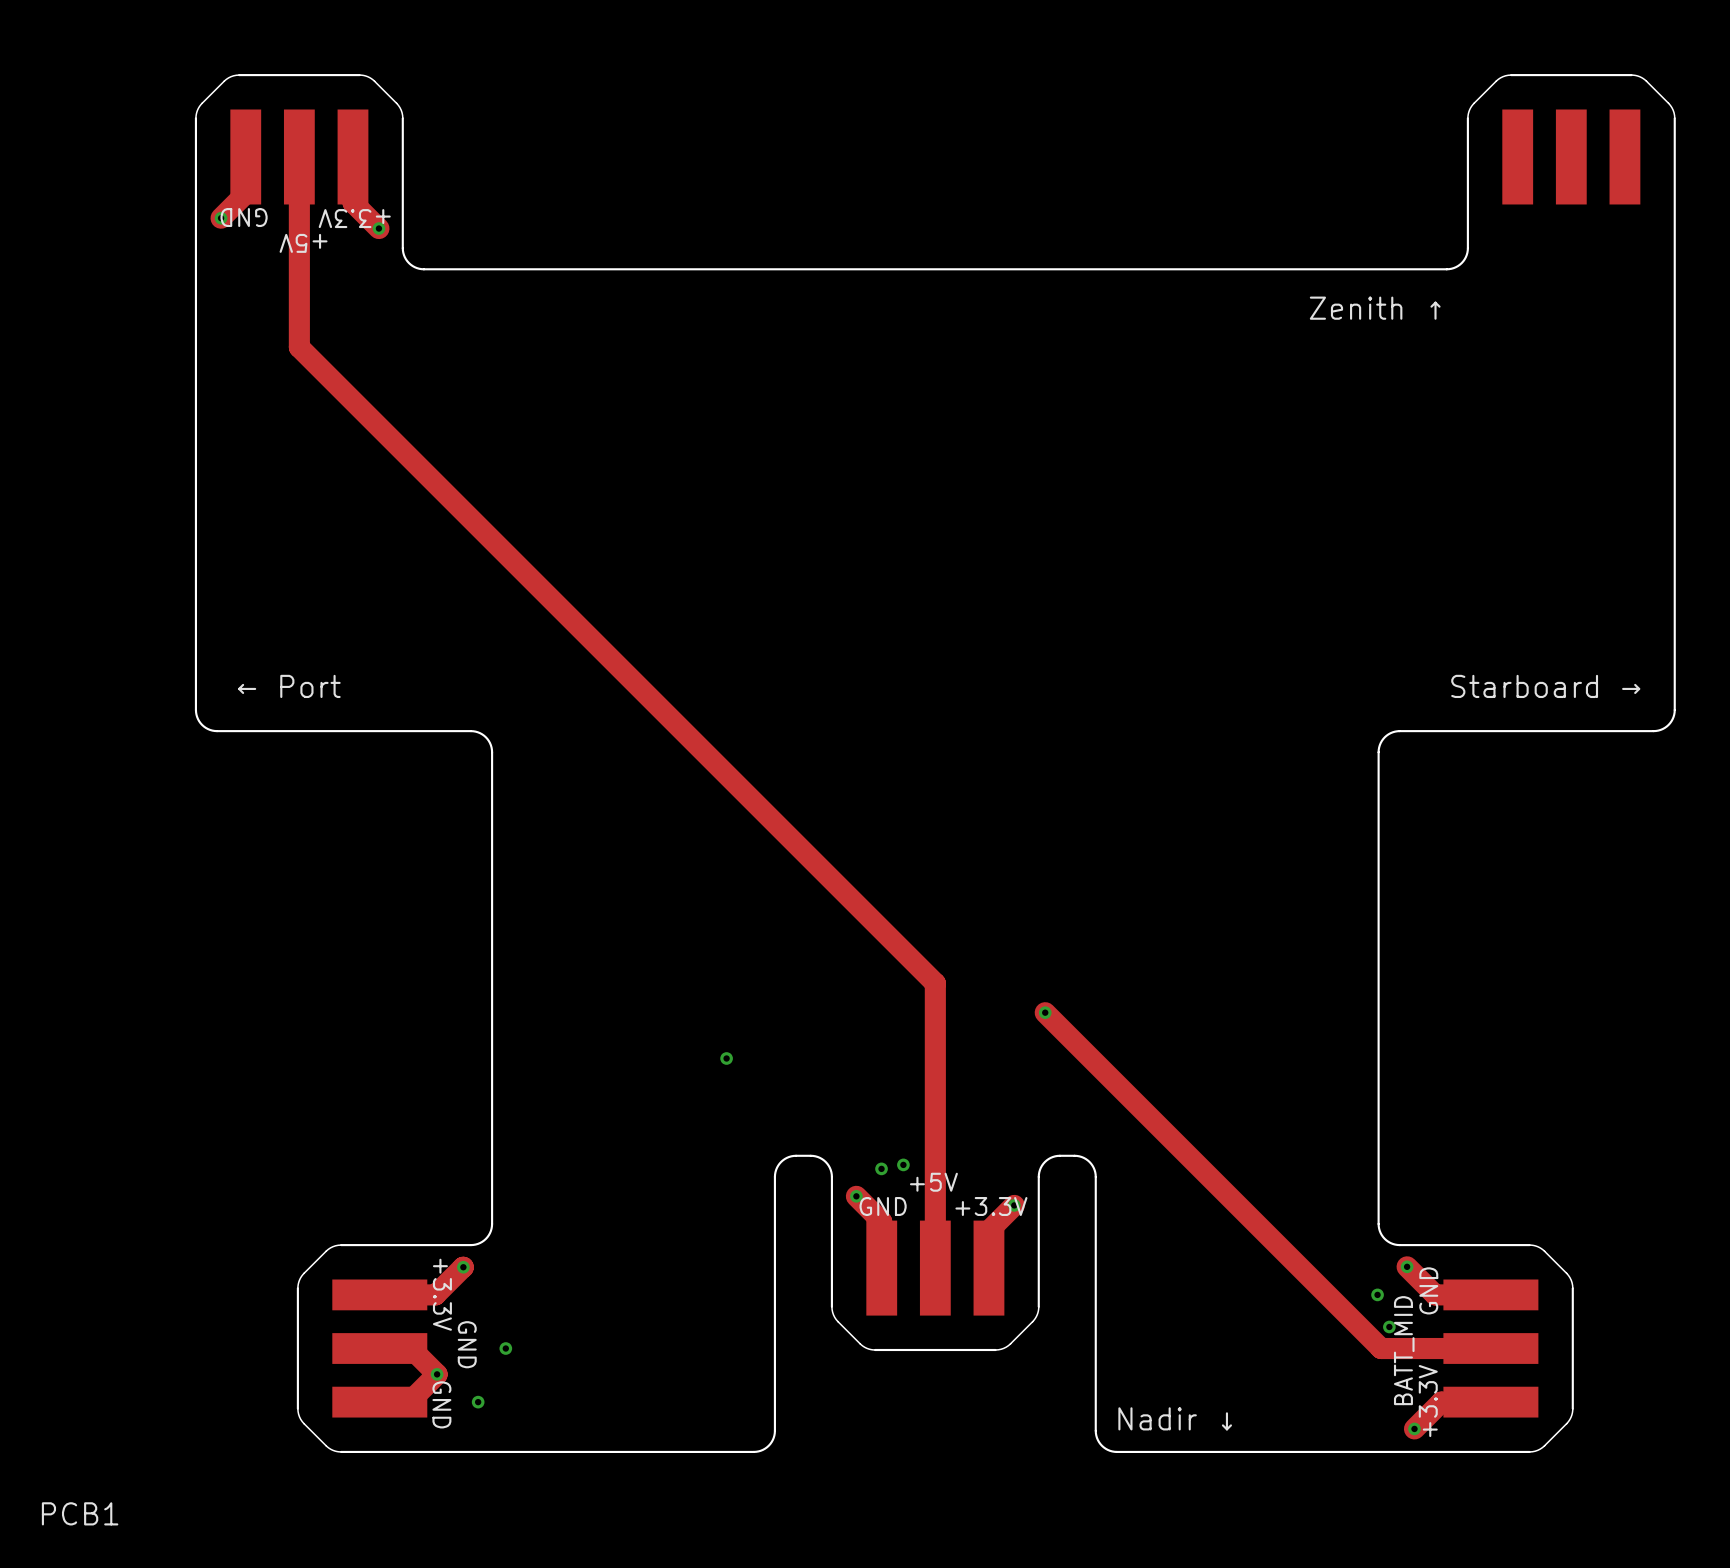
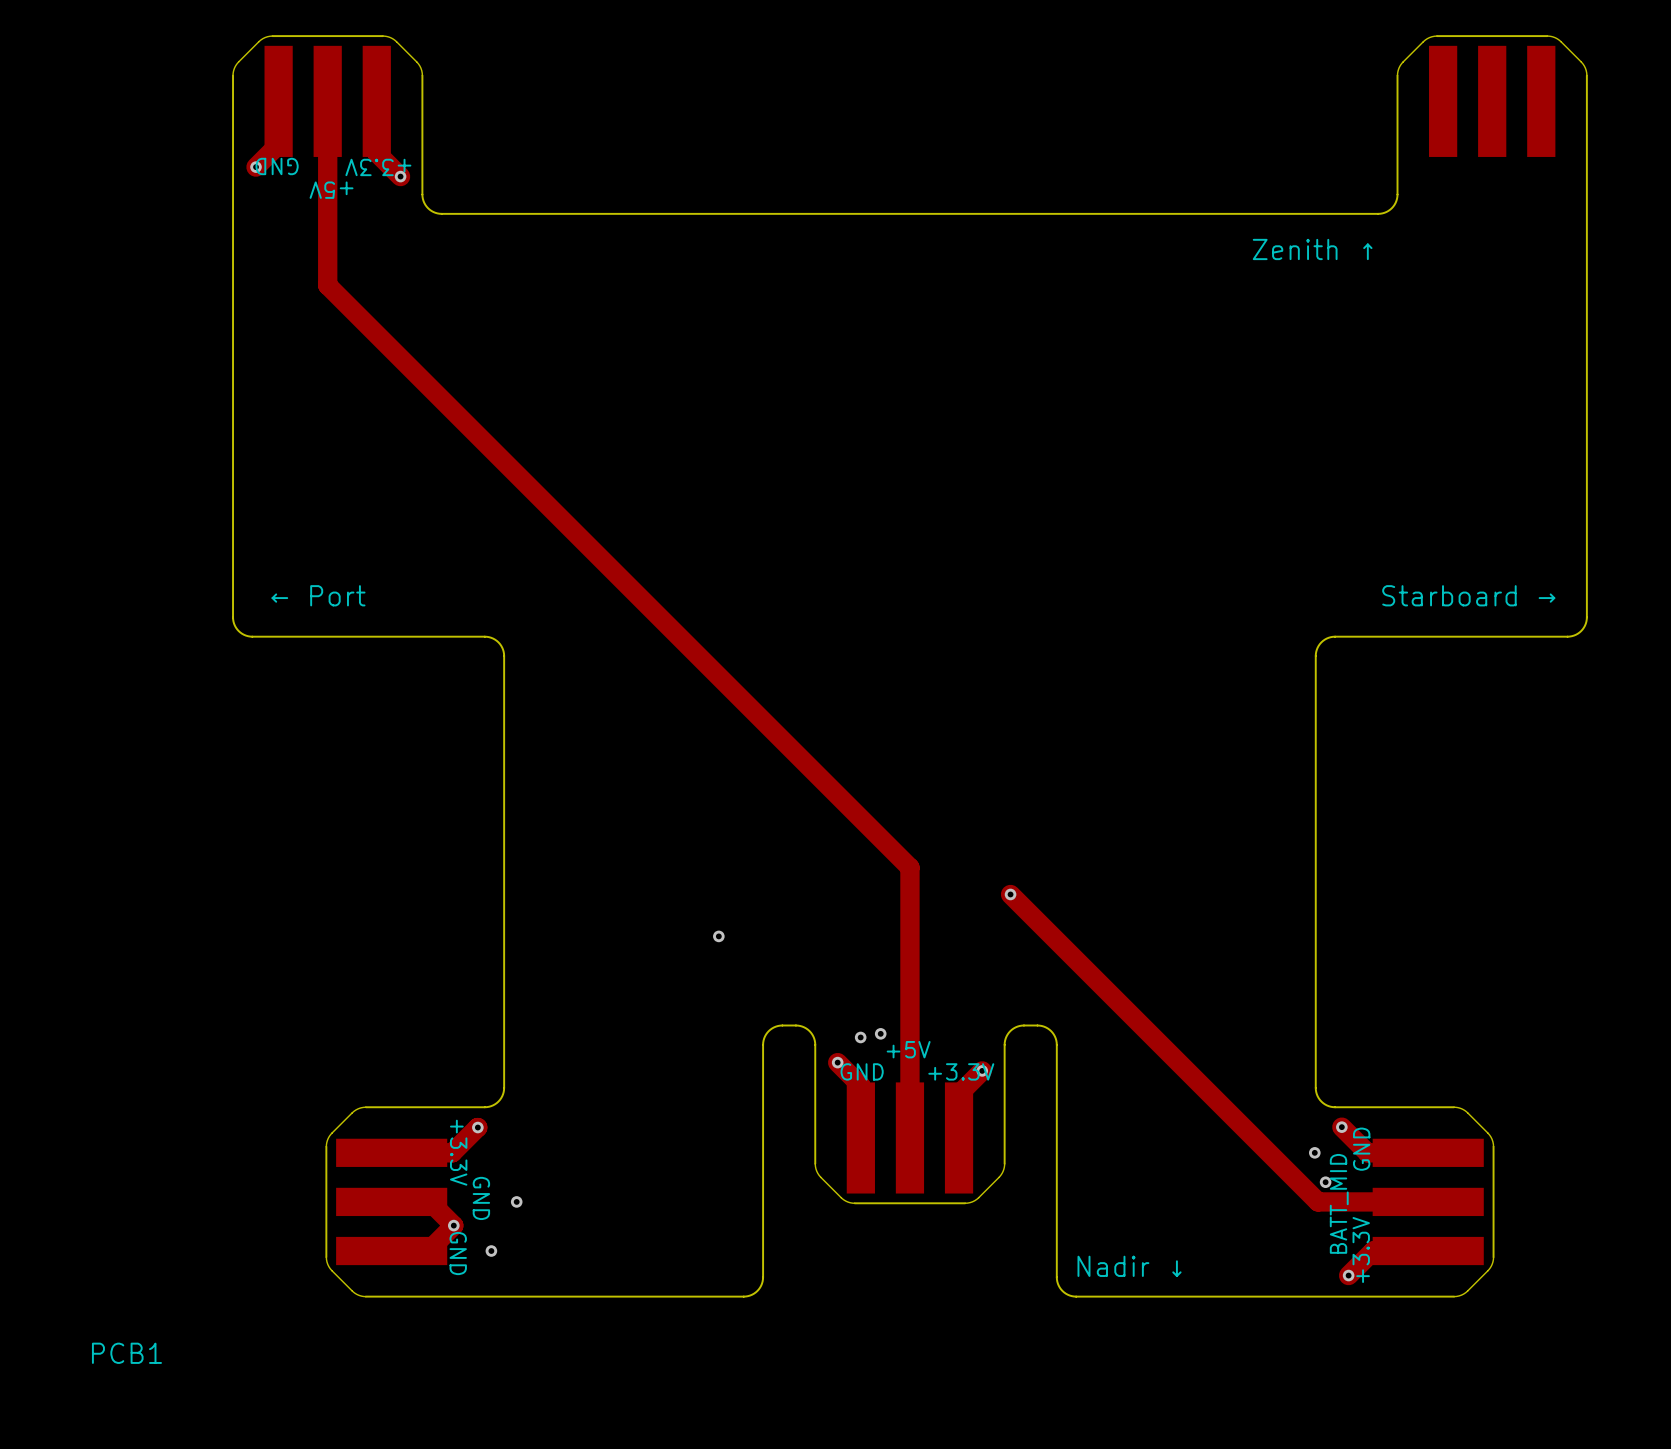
PCB1 footprint: [194, 74, 1676, 1454] -> [232, 35, 1588, 1298]

